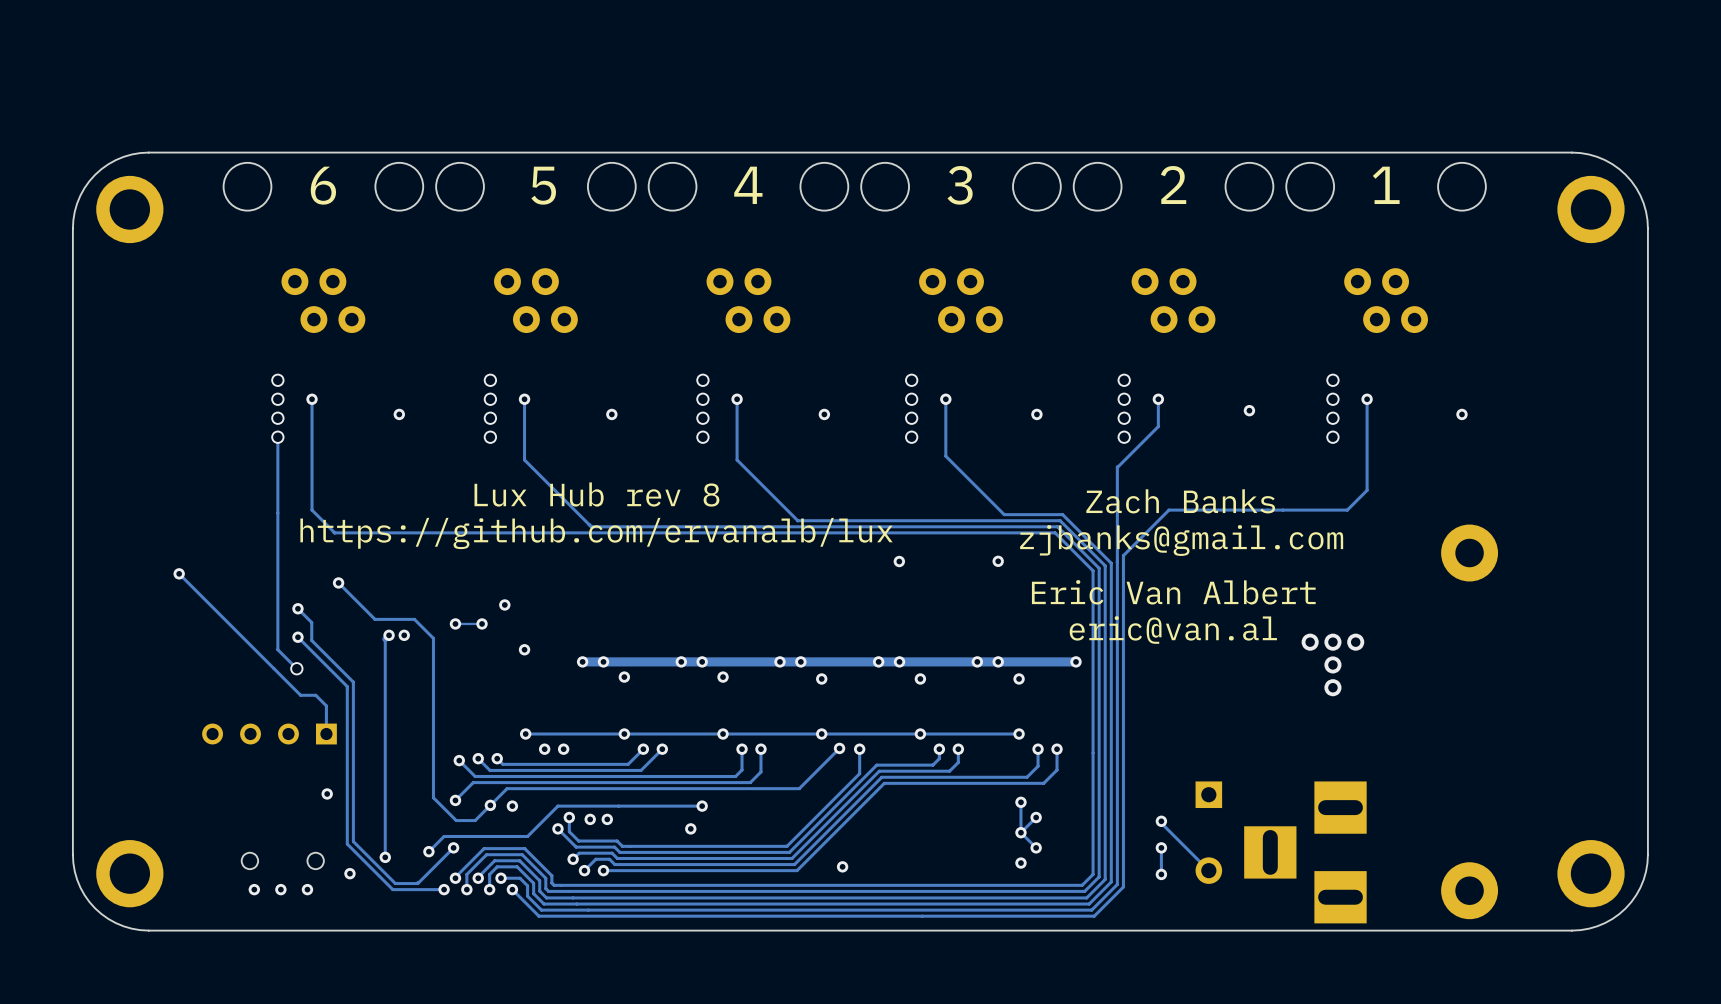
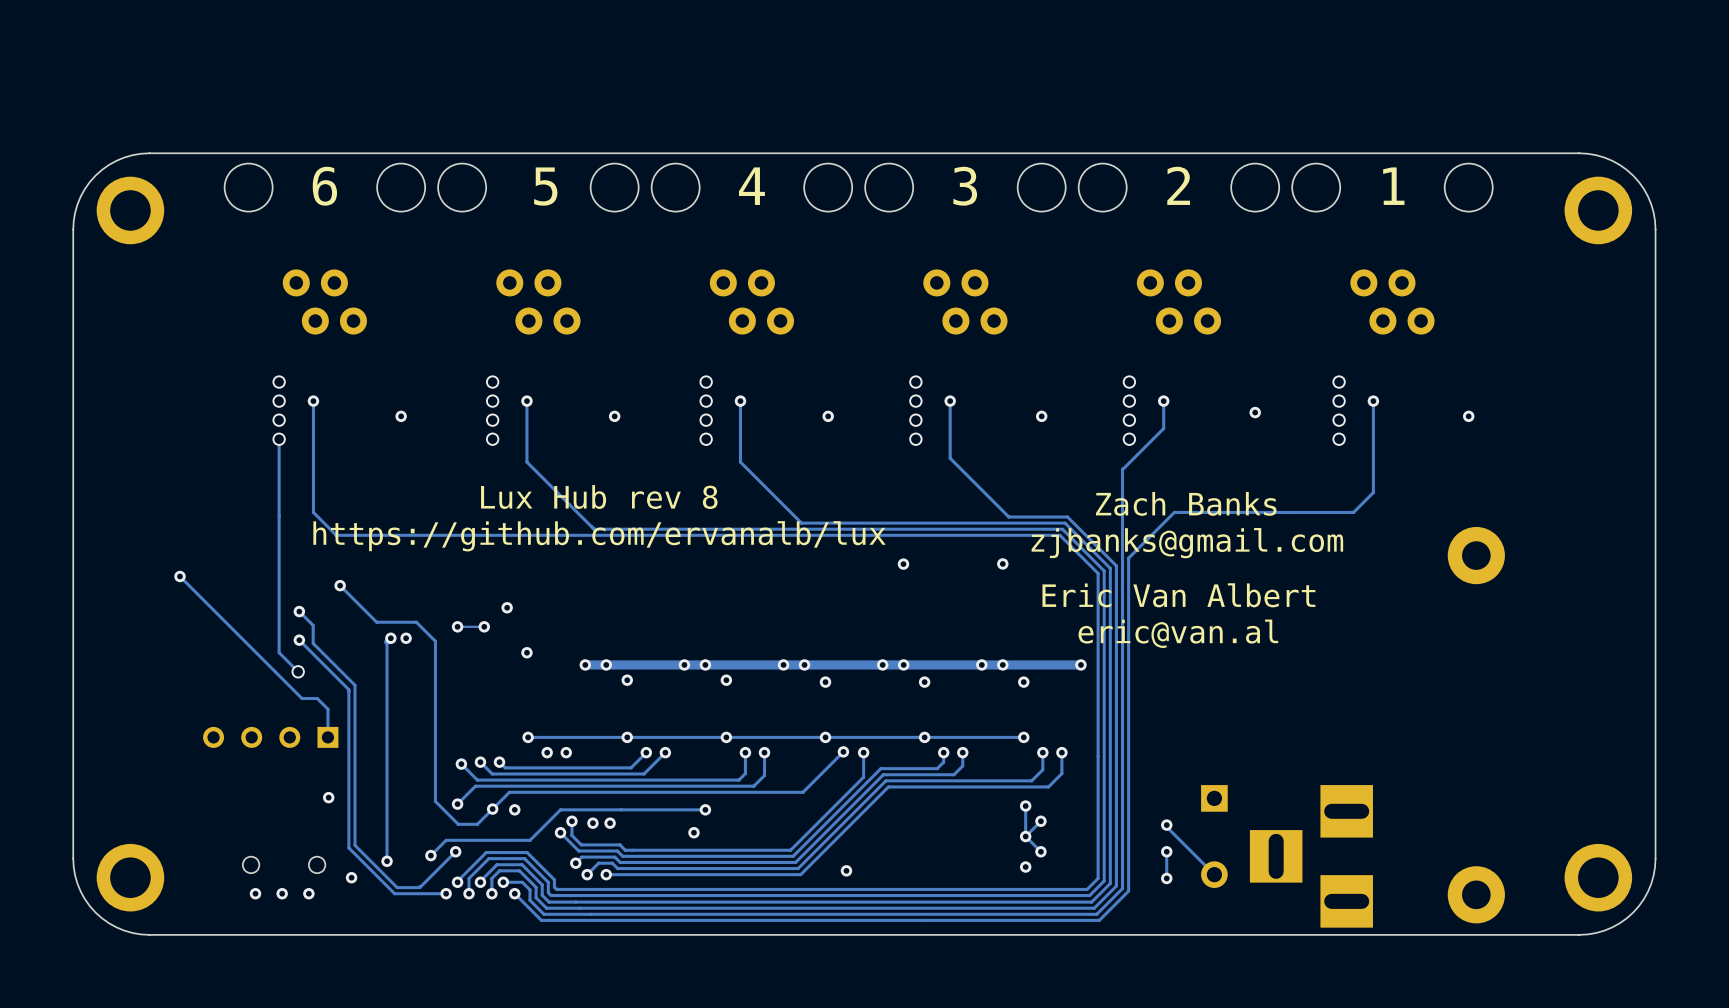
via: (1310, 642) -> none
via: (1332, 642) -> none
via: (1355, 642) -> none
via: (1332, 664) -> none
via: (1332, 687) -> none

